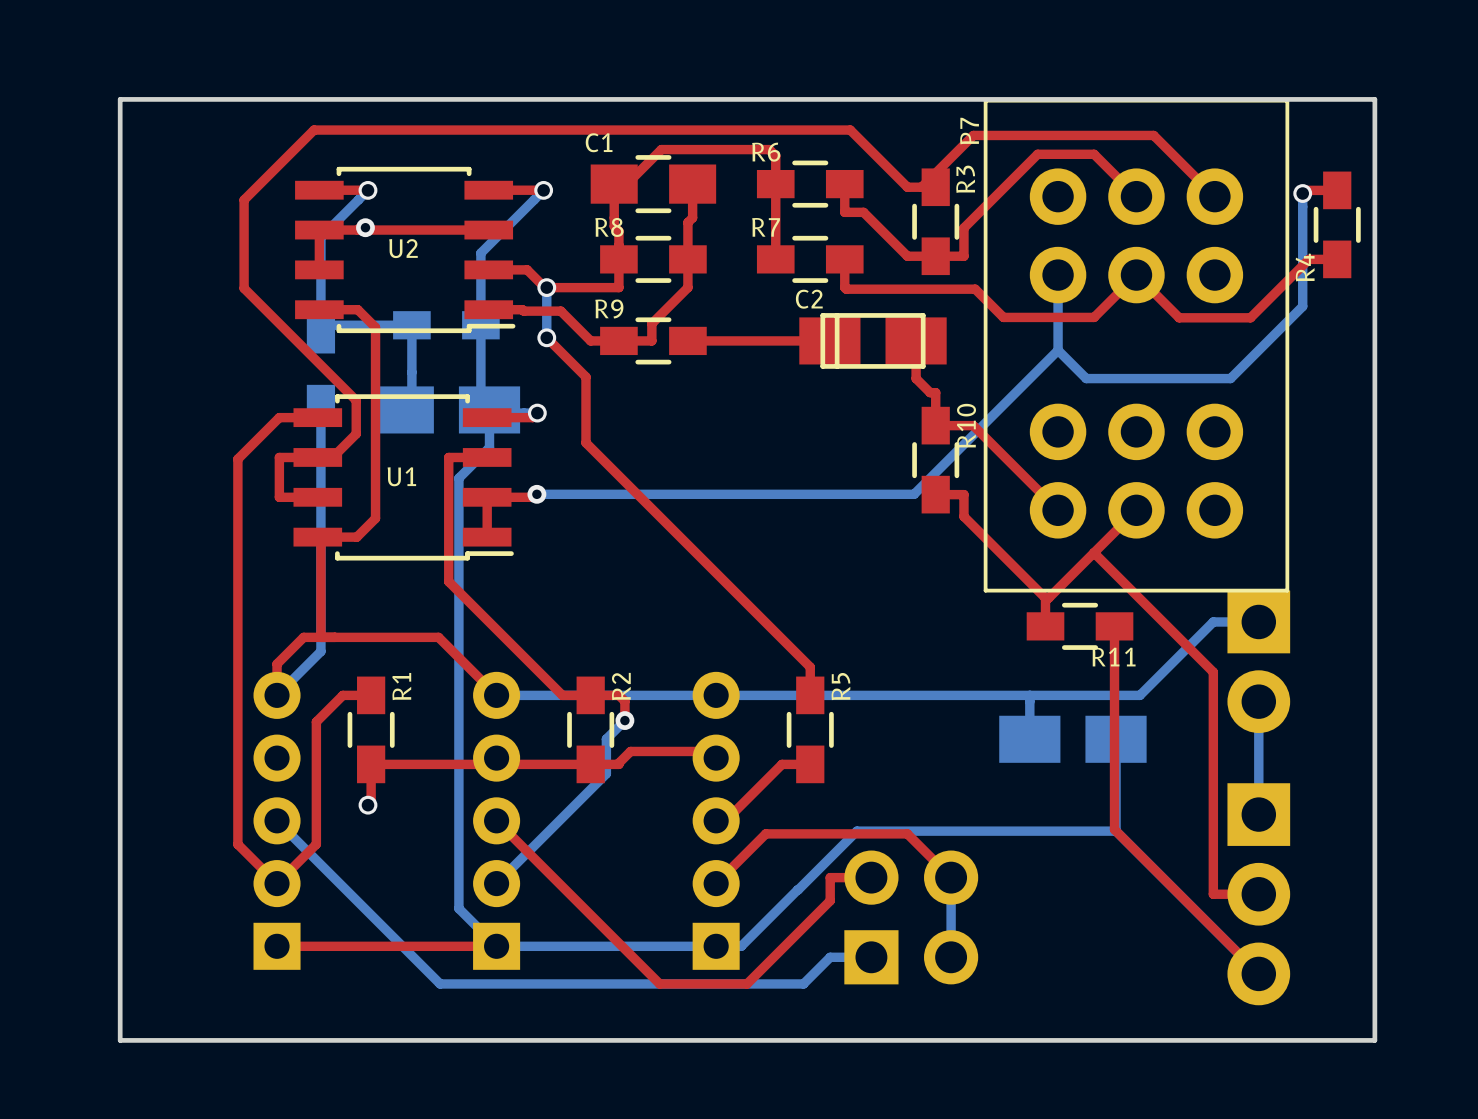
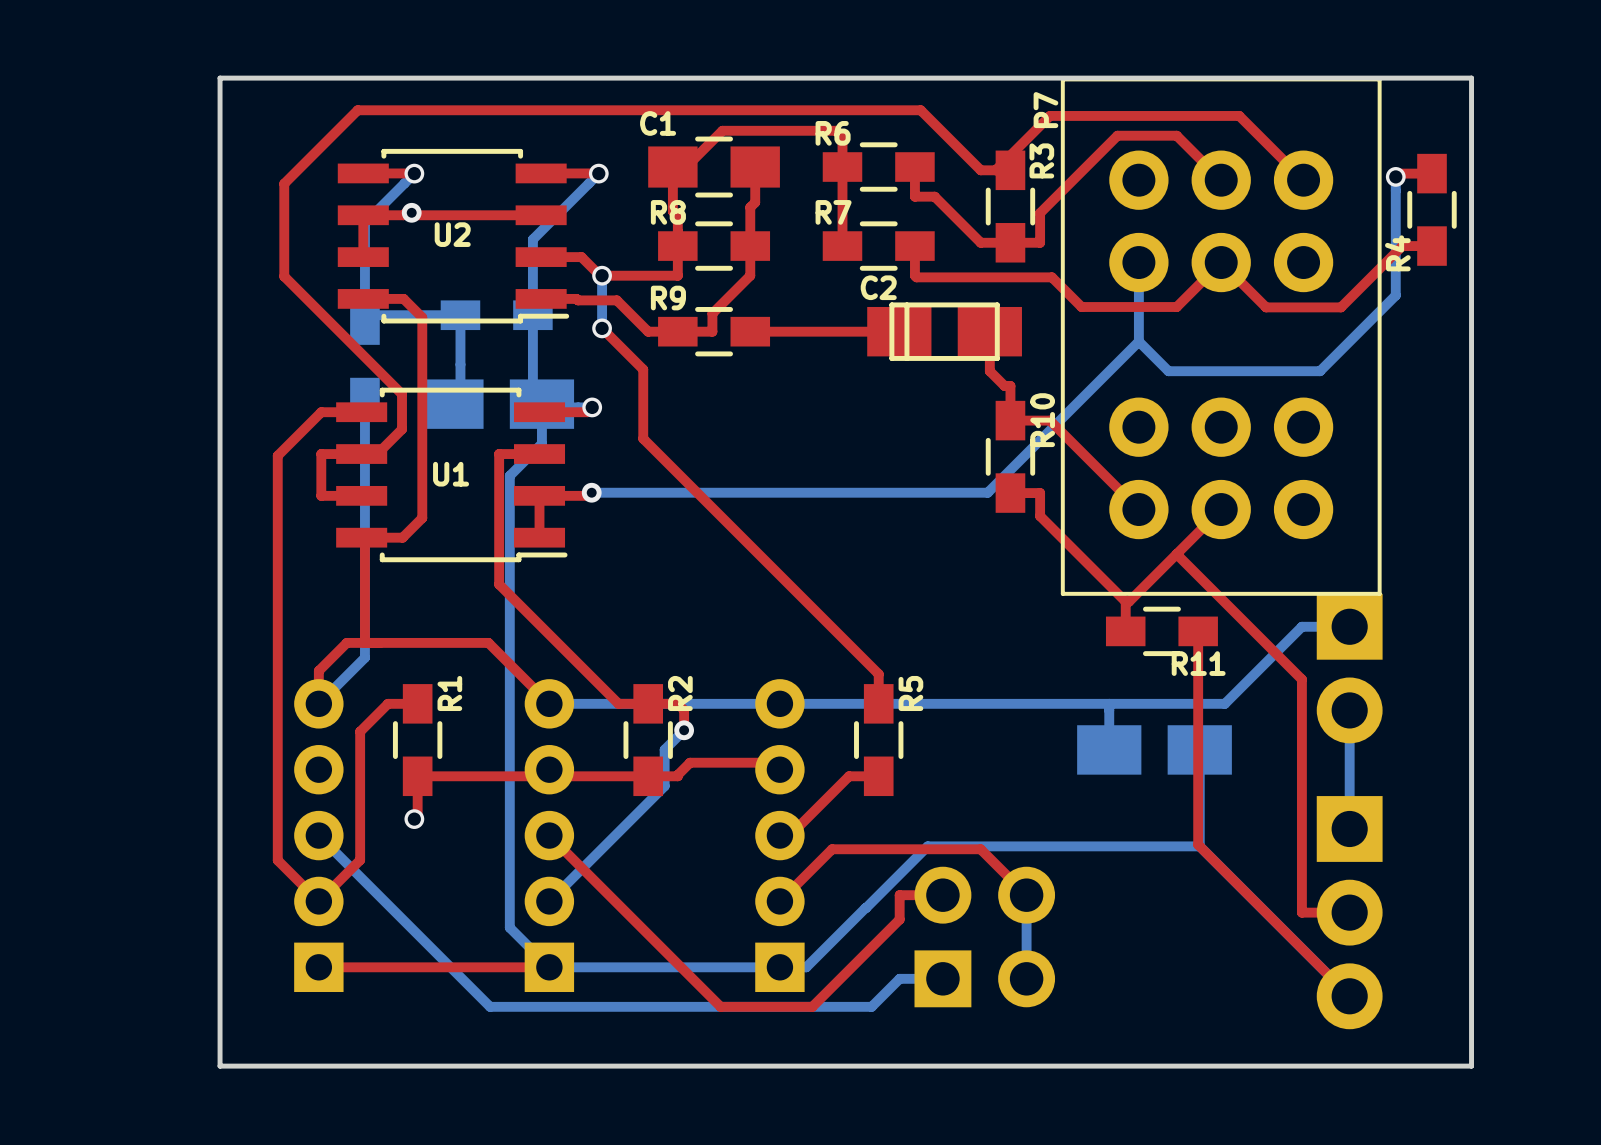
board edge: (182, 99) (120, 99) (120, 1040) (182, 1040) -> (220, 78) (220, 1066)

